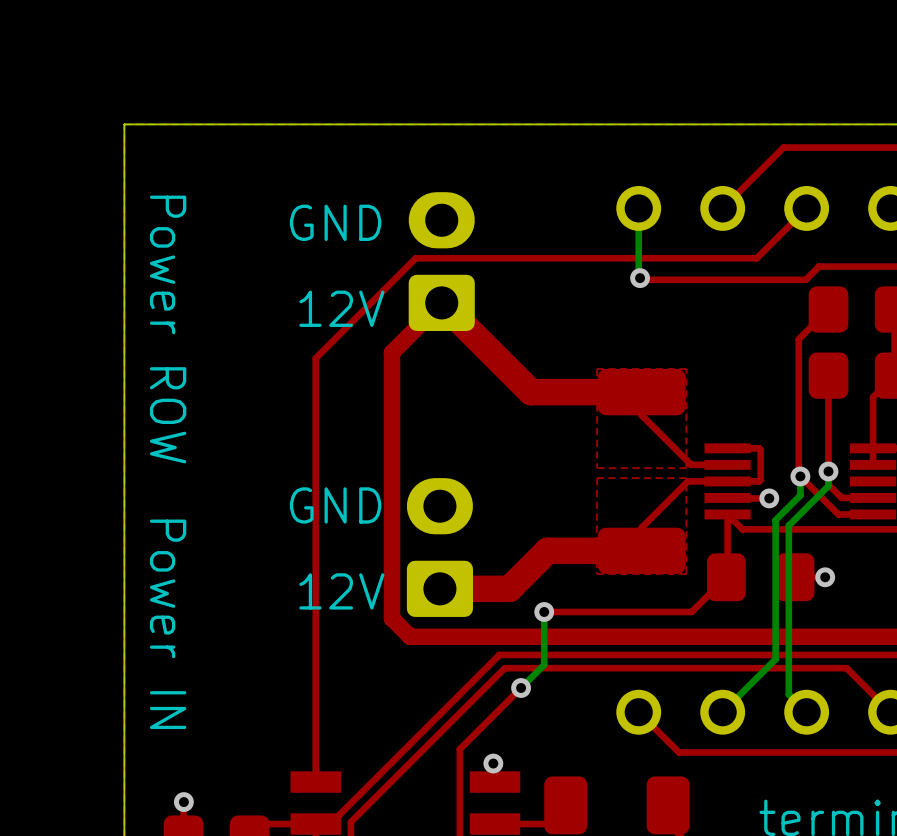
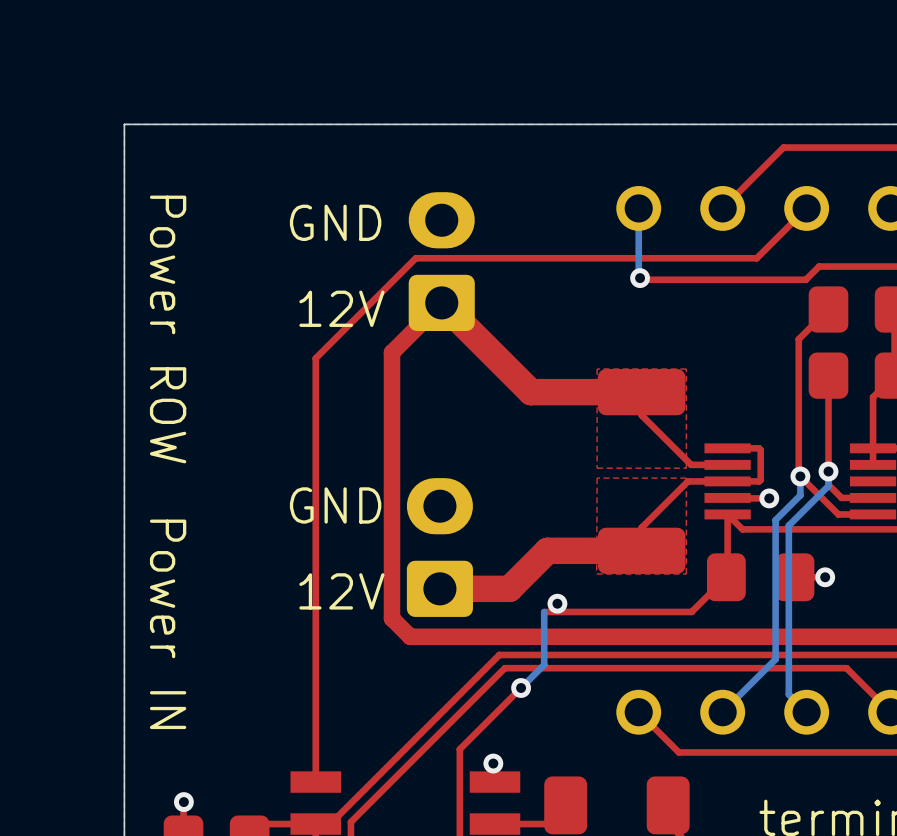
via position: (544, 611) -> (557, 603)

